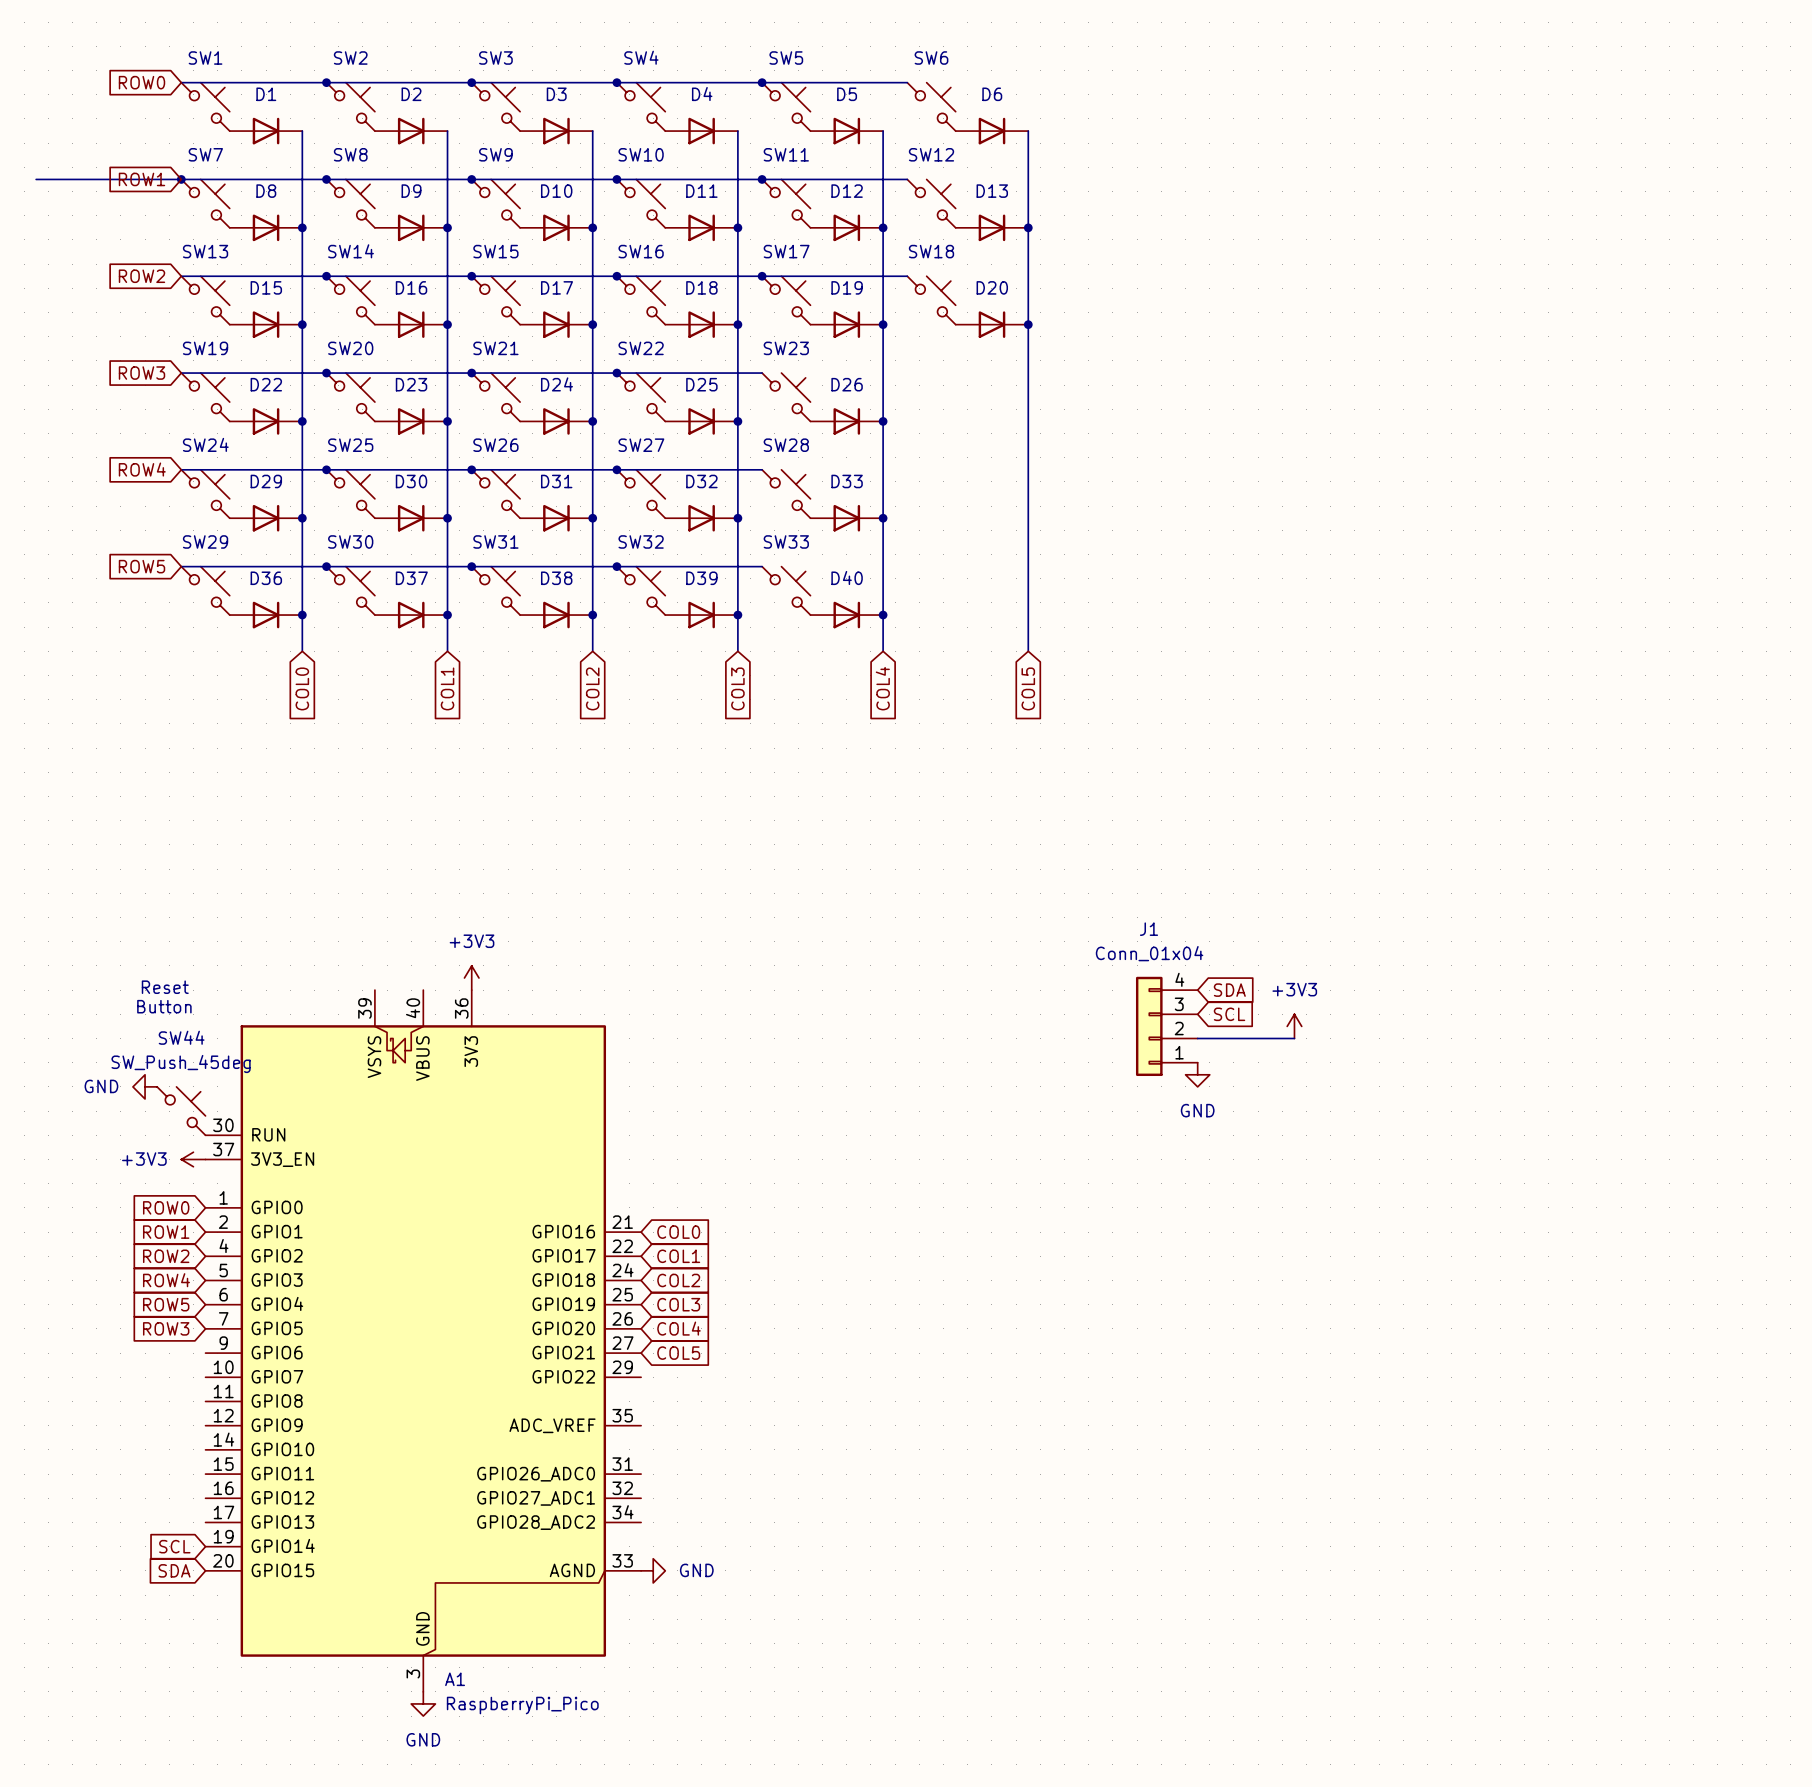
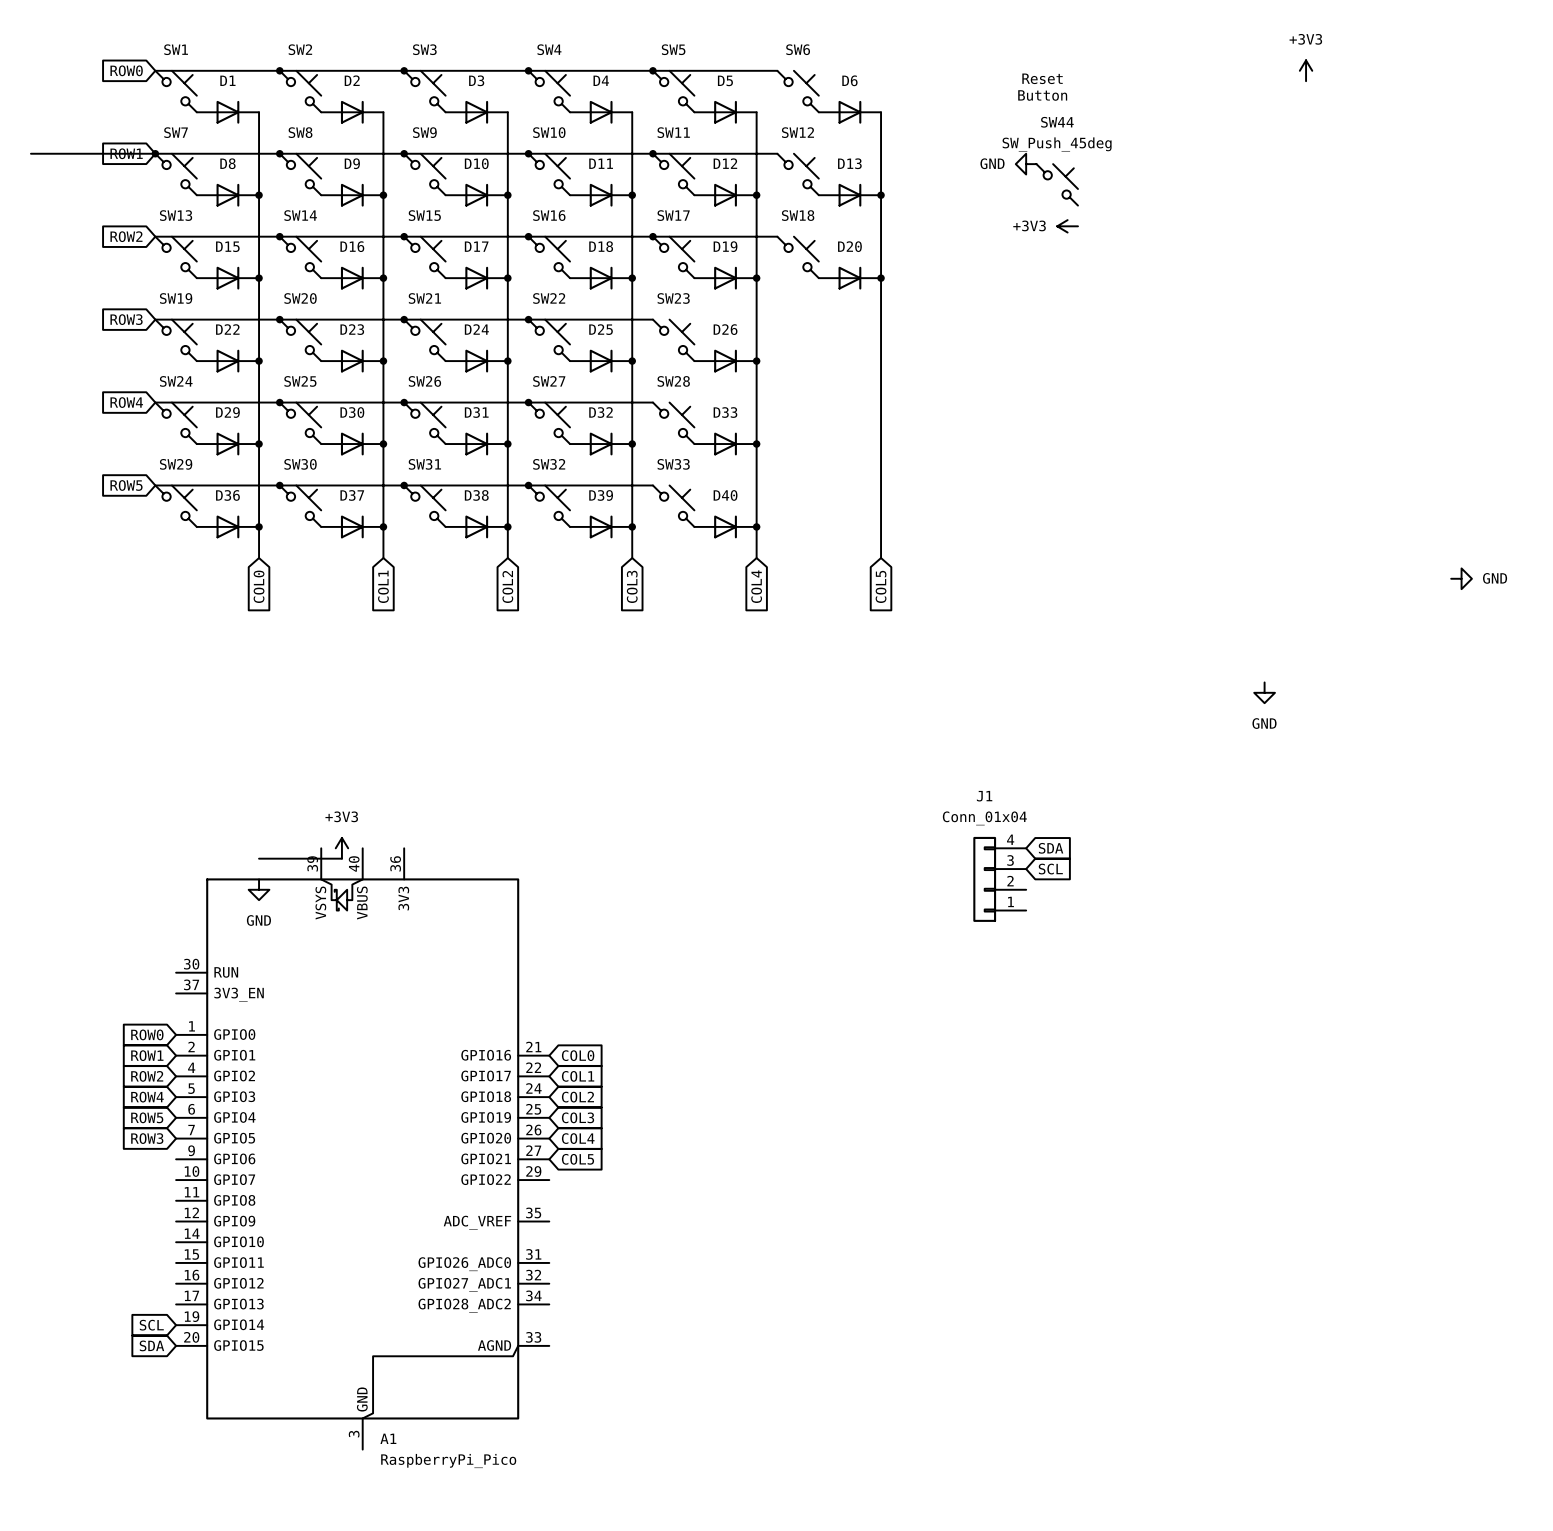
power symbol: none -> +3V3 (1306, 70)
text: none -> Reset (1042, 78)
text: none -> Button (1042, 95)
power symbol: none -> GND (1026, 164)
power symbol: none -> +3V3 (1067, 226)
power symbol: none -> GND (1461, 578)
power symbol: none -> GND (1264, 692)
power symbol position: +3V3 (471, 978) -> +3V3 (341, 848)
text: Reset (165, 987) -> none
wire: none -> (259, 858) (341, 858)
text: Button (164, 1006) -> none
power symbol: +3V3 (1294, 1026) -> none
wire: (1197, 1038) (1294, 1038) -> none
power symbol: GND (1197, 1074) -> none
power symbol rotation: 0° (145, 1086) -> 90° counterclockwise (259, 889)
power symbol position: GND (145, 1086) -> GND (259, 889)
SW44 position: (181, 1111) -> (1057, 184)
power symbol: +3V3 (193, 1159) -> none
power symbol: GND (653, 1570) -> none
power symbol: GND (423, 1703) -> none

